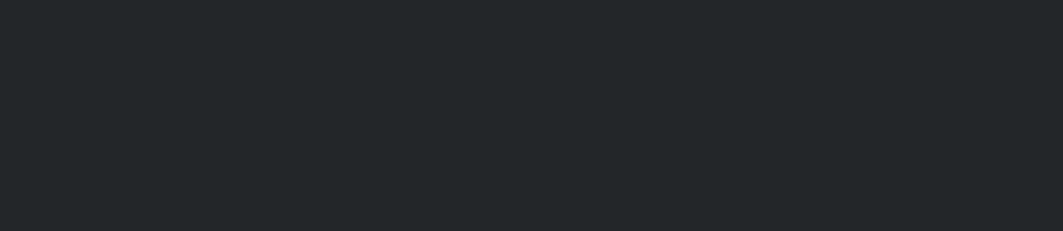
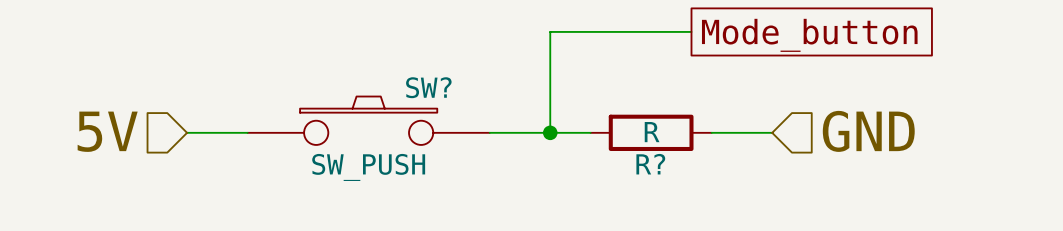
wire: none -> (691, 31) (550, 31) (550, 132)
global label: none -> Mode_button (809, 35)
SW?: none -> SW_PUSH (368, 120)
hierarchical label: none -> 5V (107, 131)
hierarchical label: none -> GND (868, 131)
wire: none -> (187, 132) (247, 132)
wire: none -> (489, 132) (590, 132)
junction: none -> (550, 132)
R?: none -> R (651, 132)
wire: none -> (711, 132) (772, 132)

